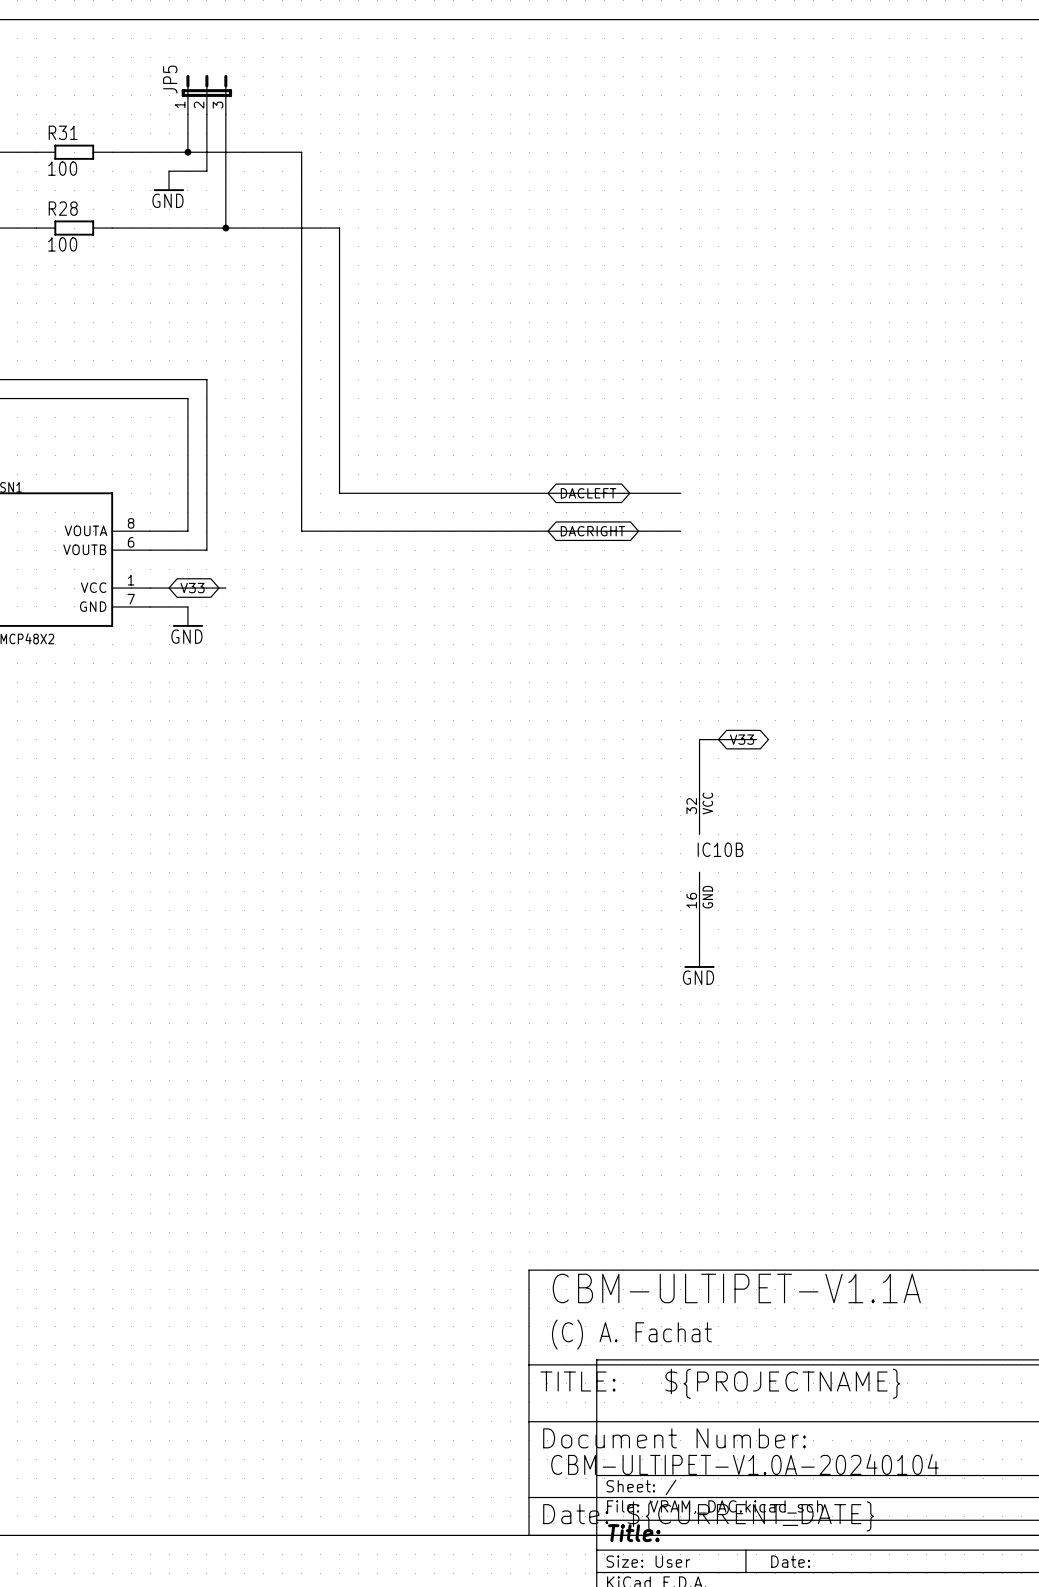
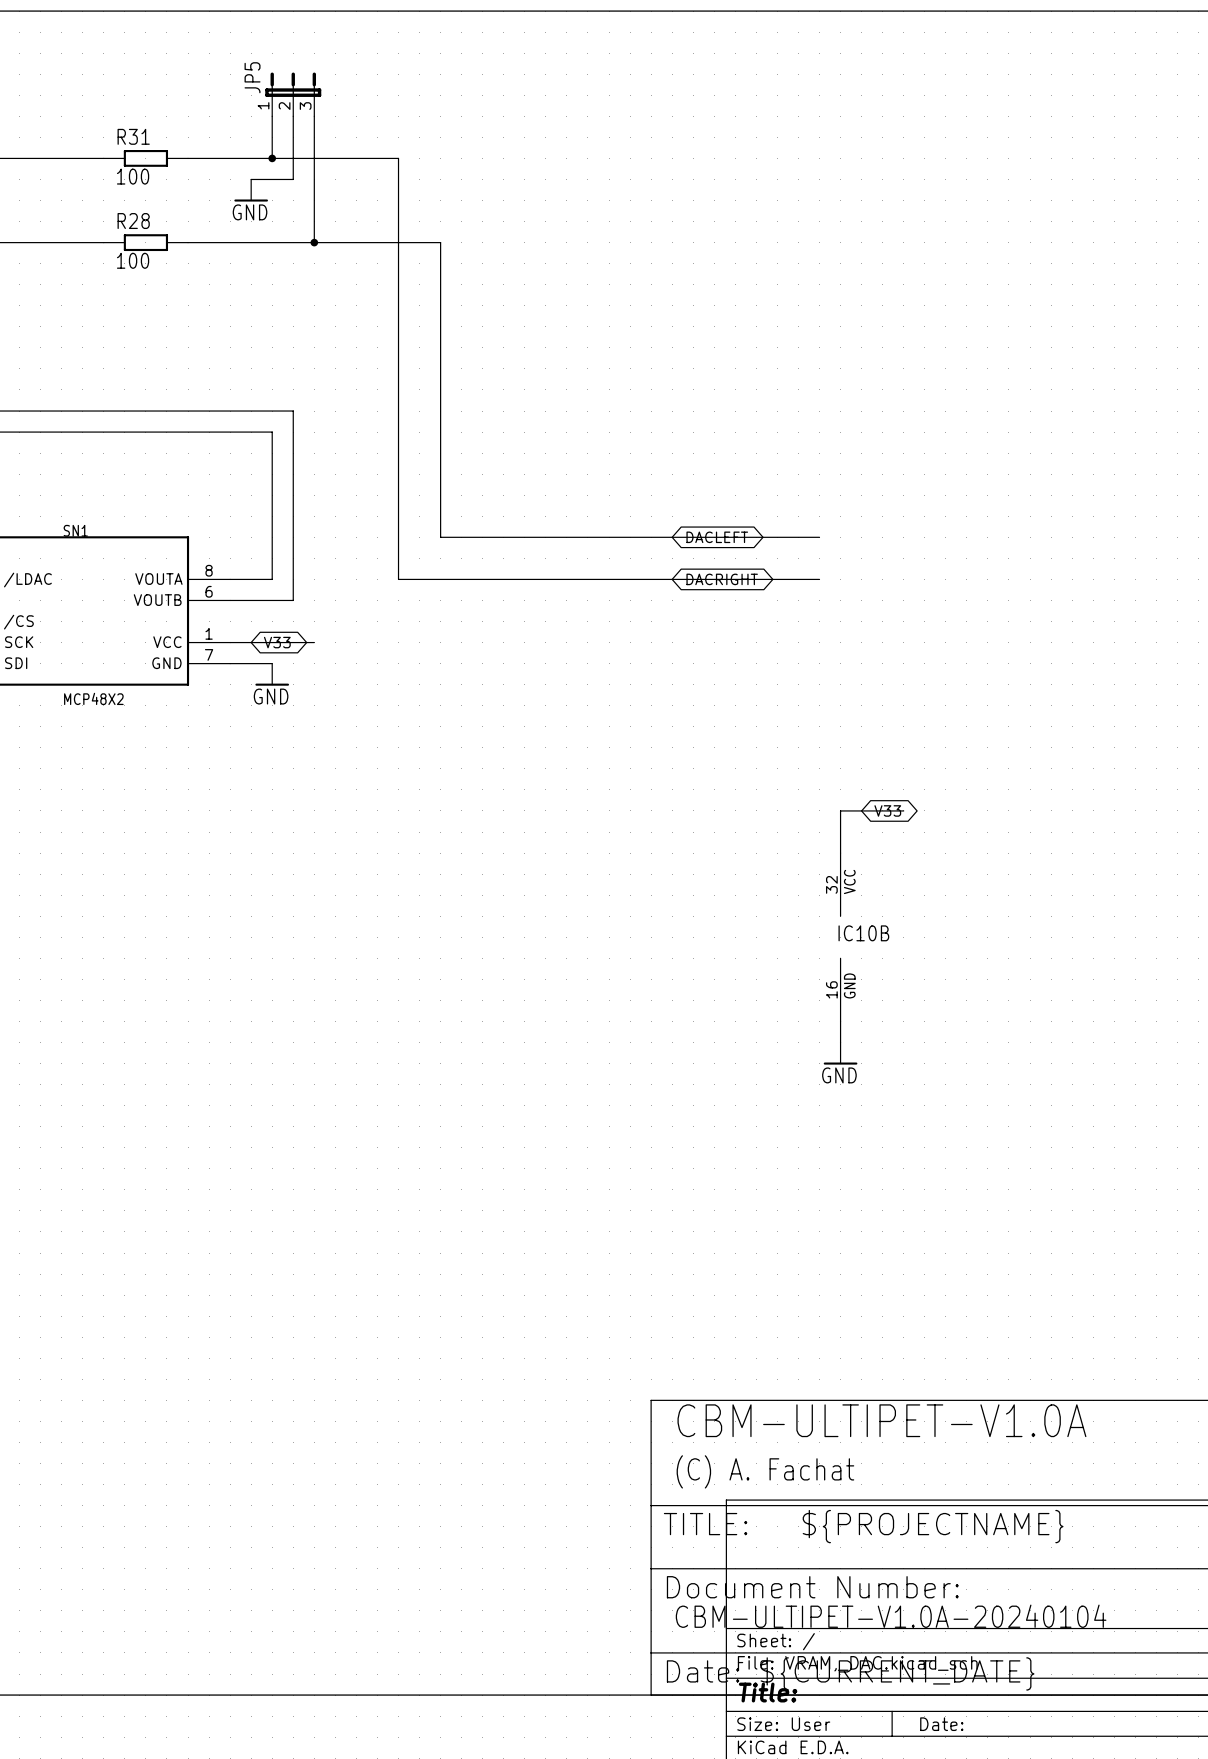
text: CBM-ULTIPET-V1.1A (736, 1288) -> CBM-ULTIPET-V1.0A (881, 1420)

